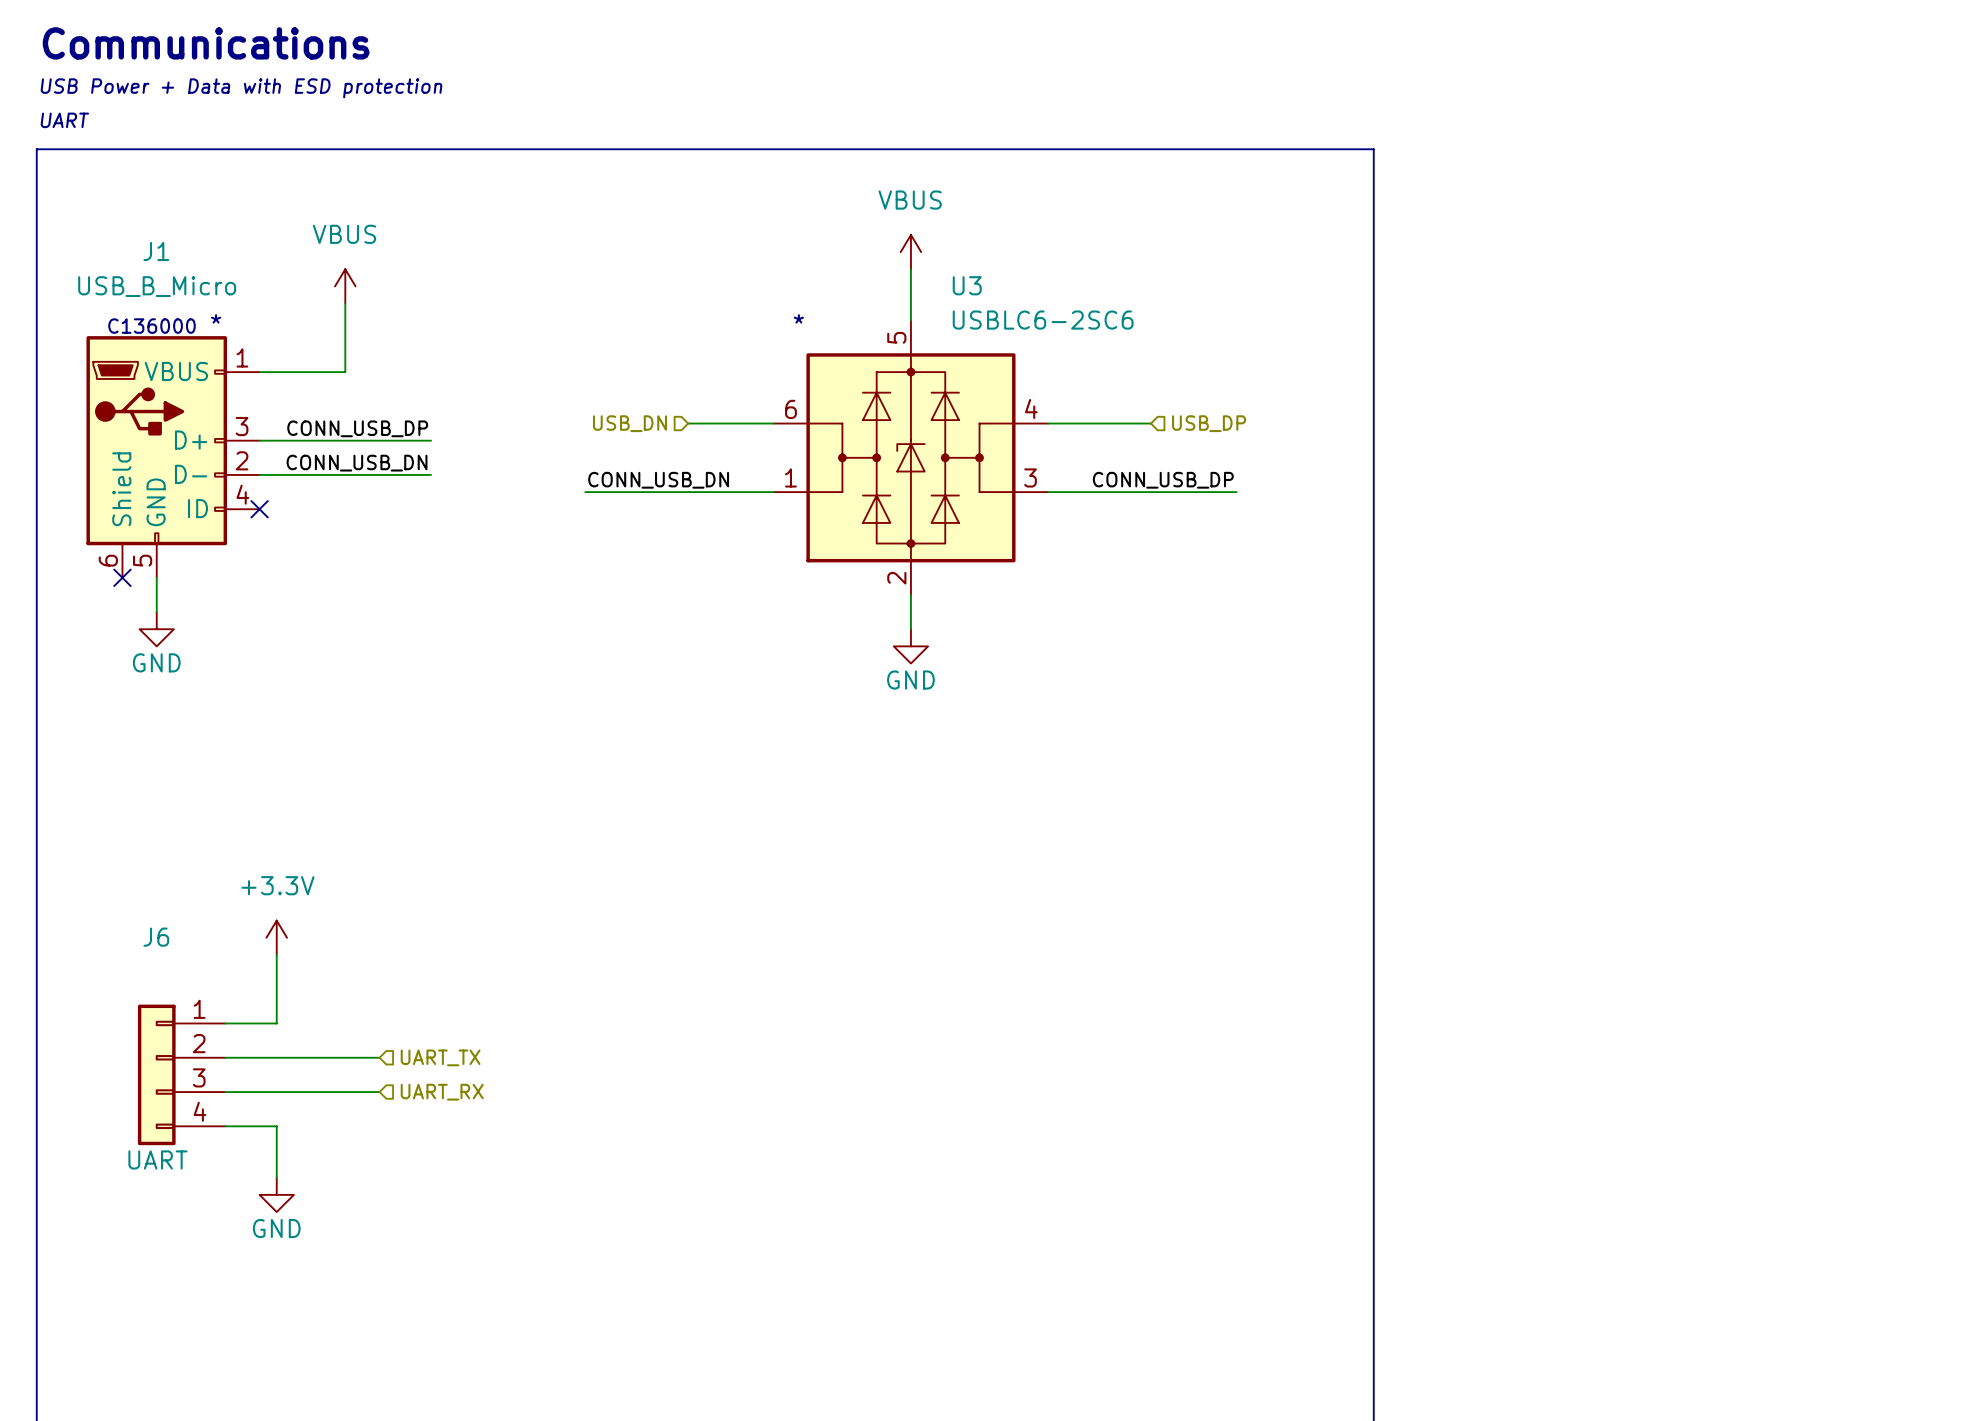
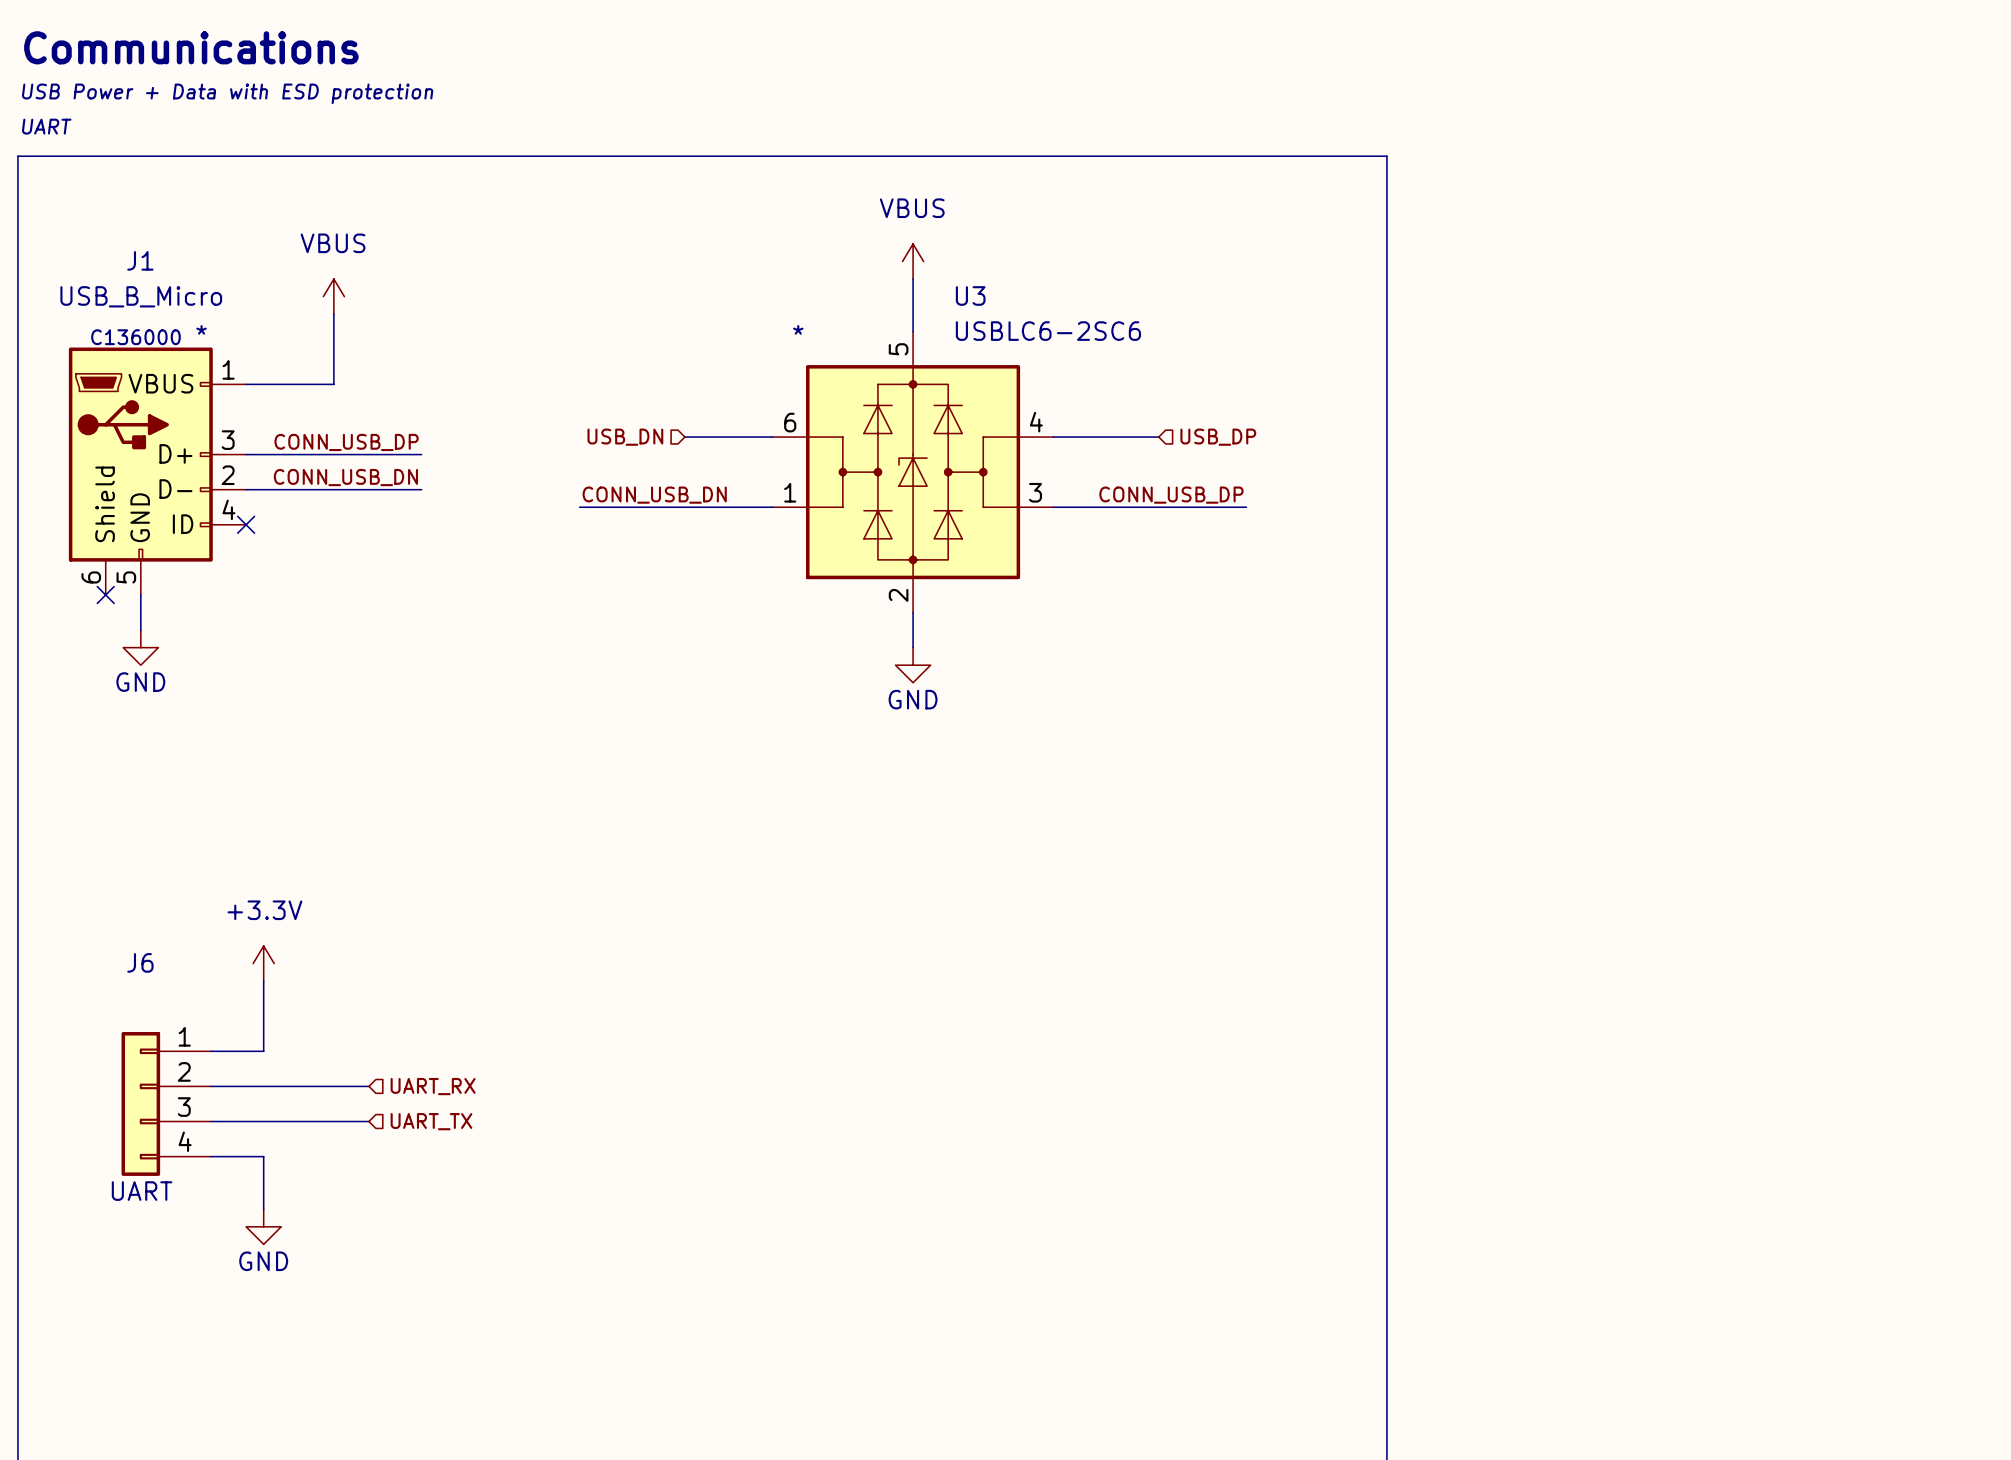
hierarchical label: UART_TX (440, 1057) -> UART_RX (433, 1086)
hierarchical label: UART_RX (442, 1092) -> UART_TX (431, 1121)

